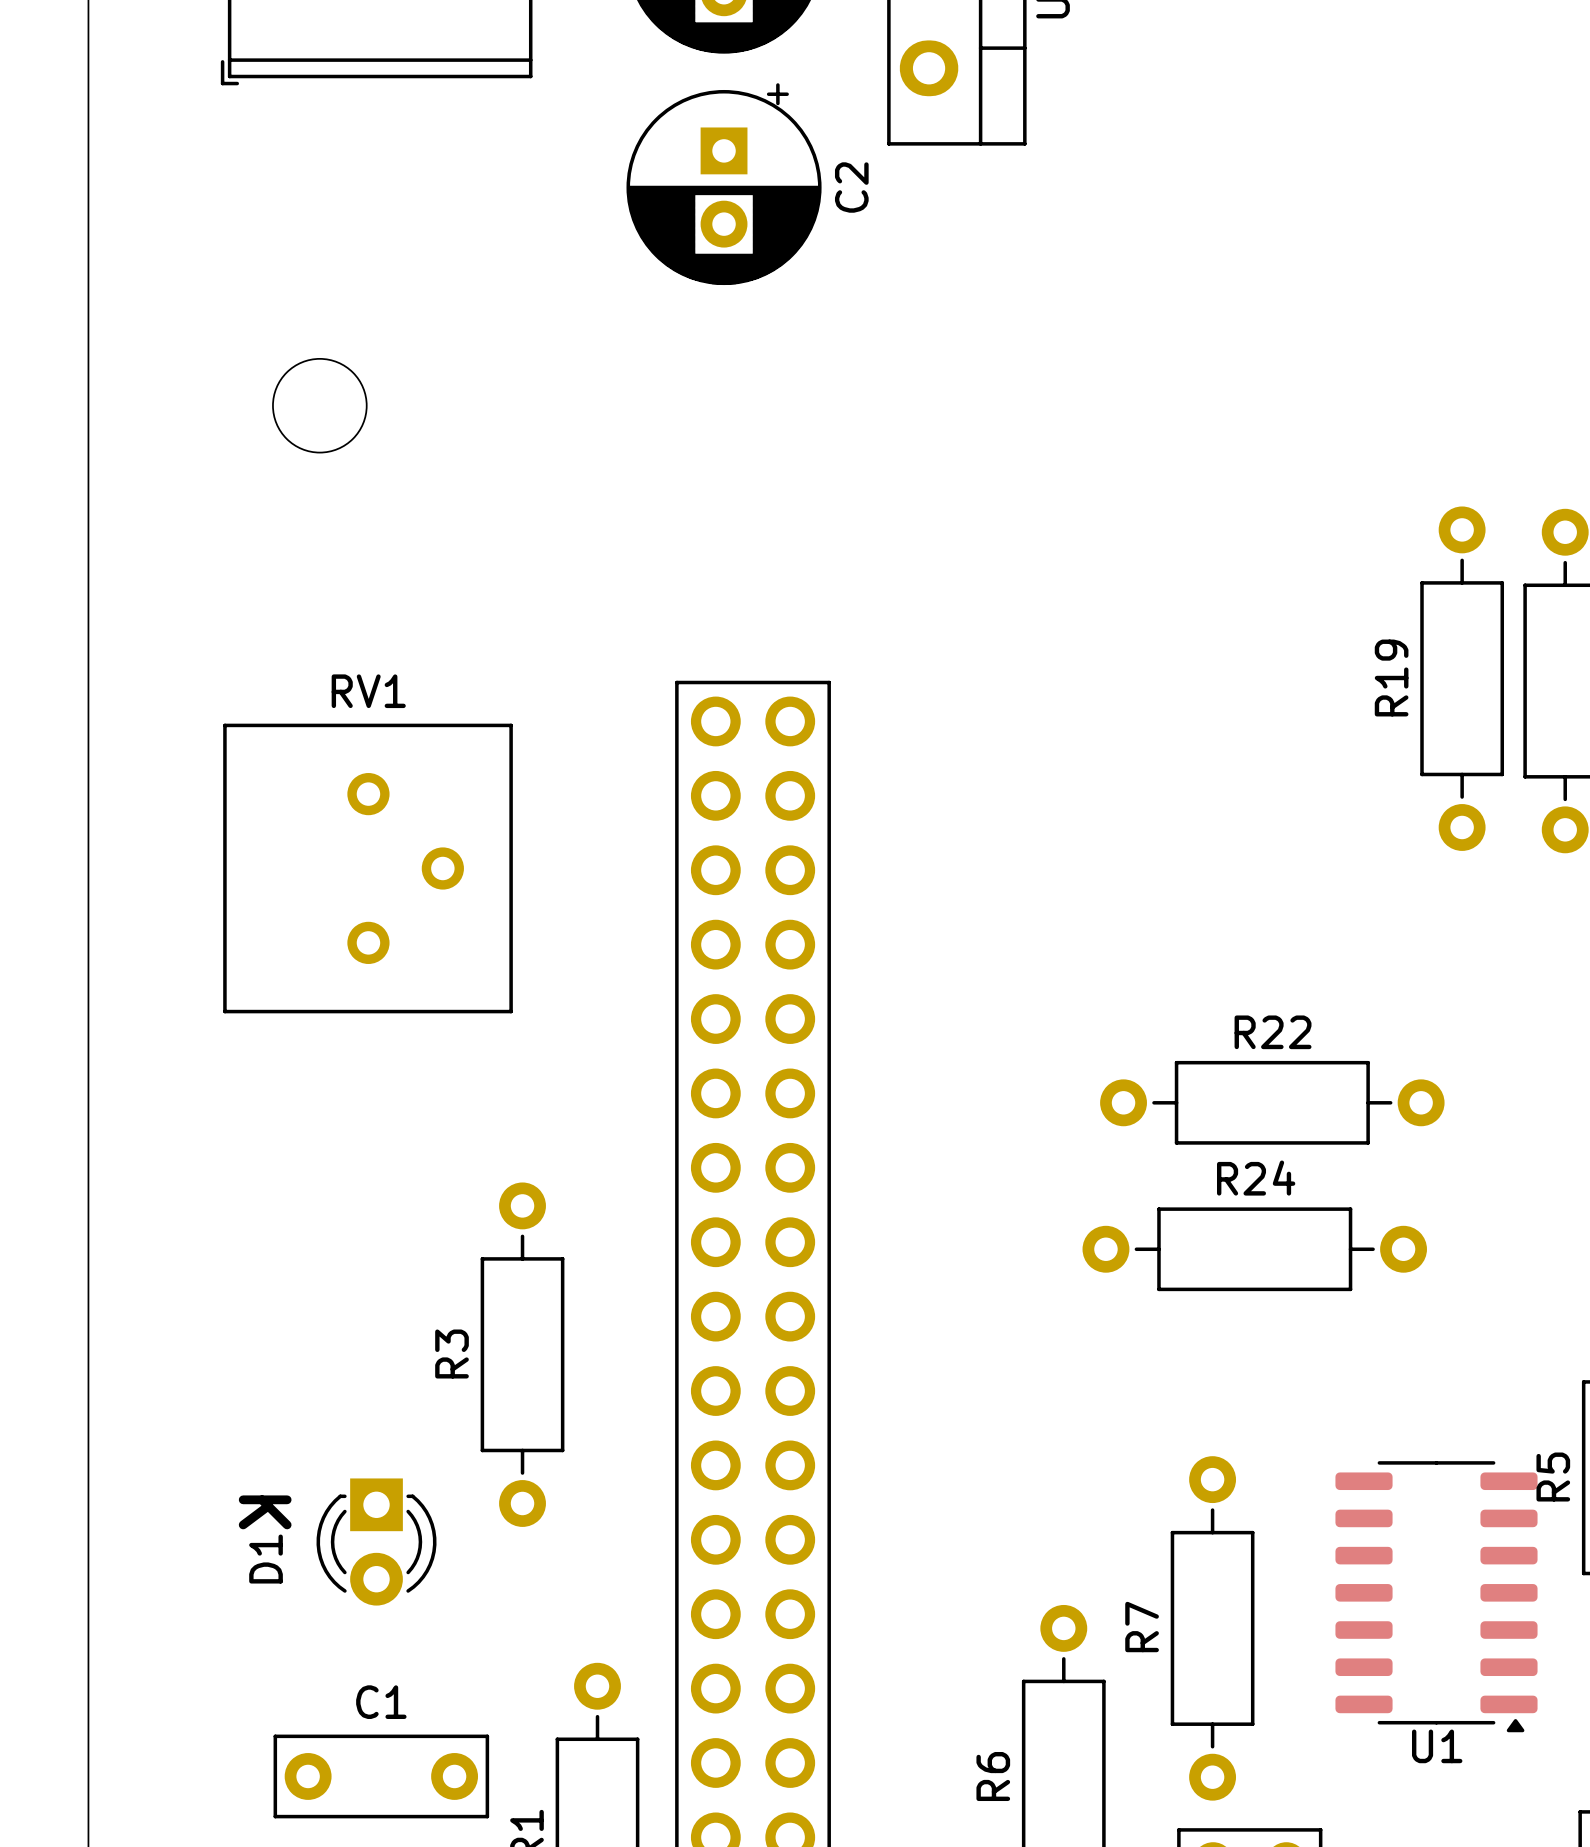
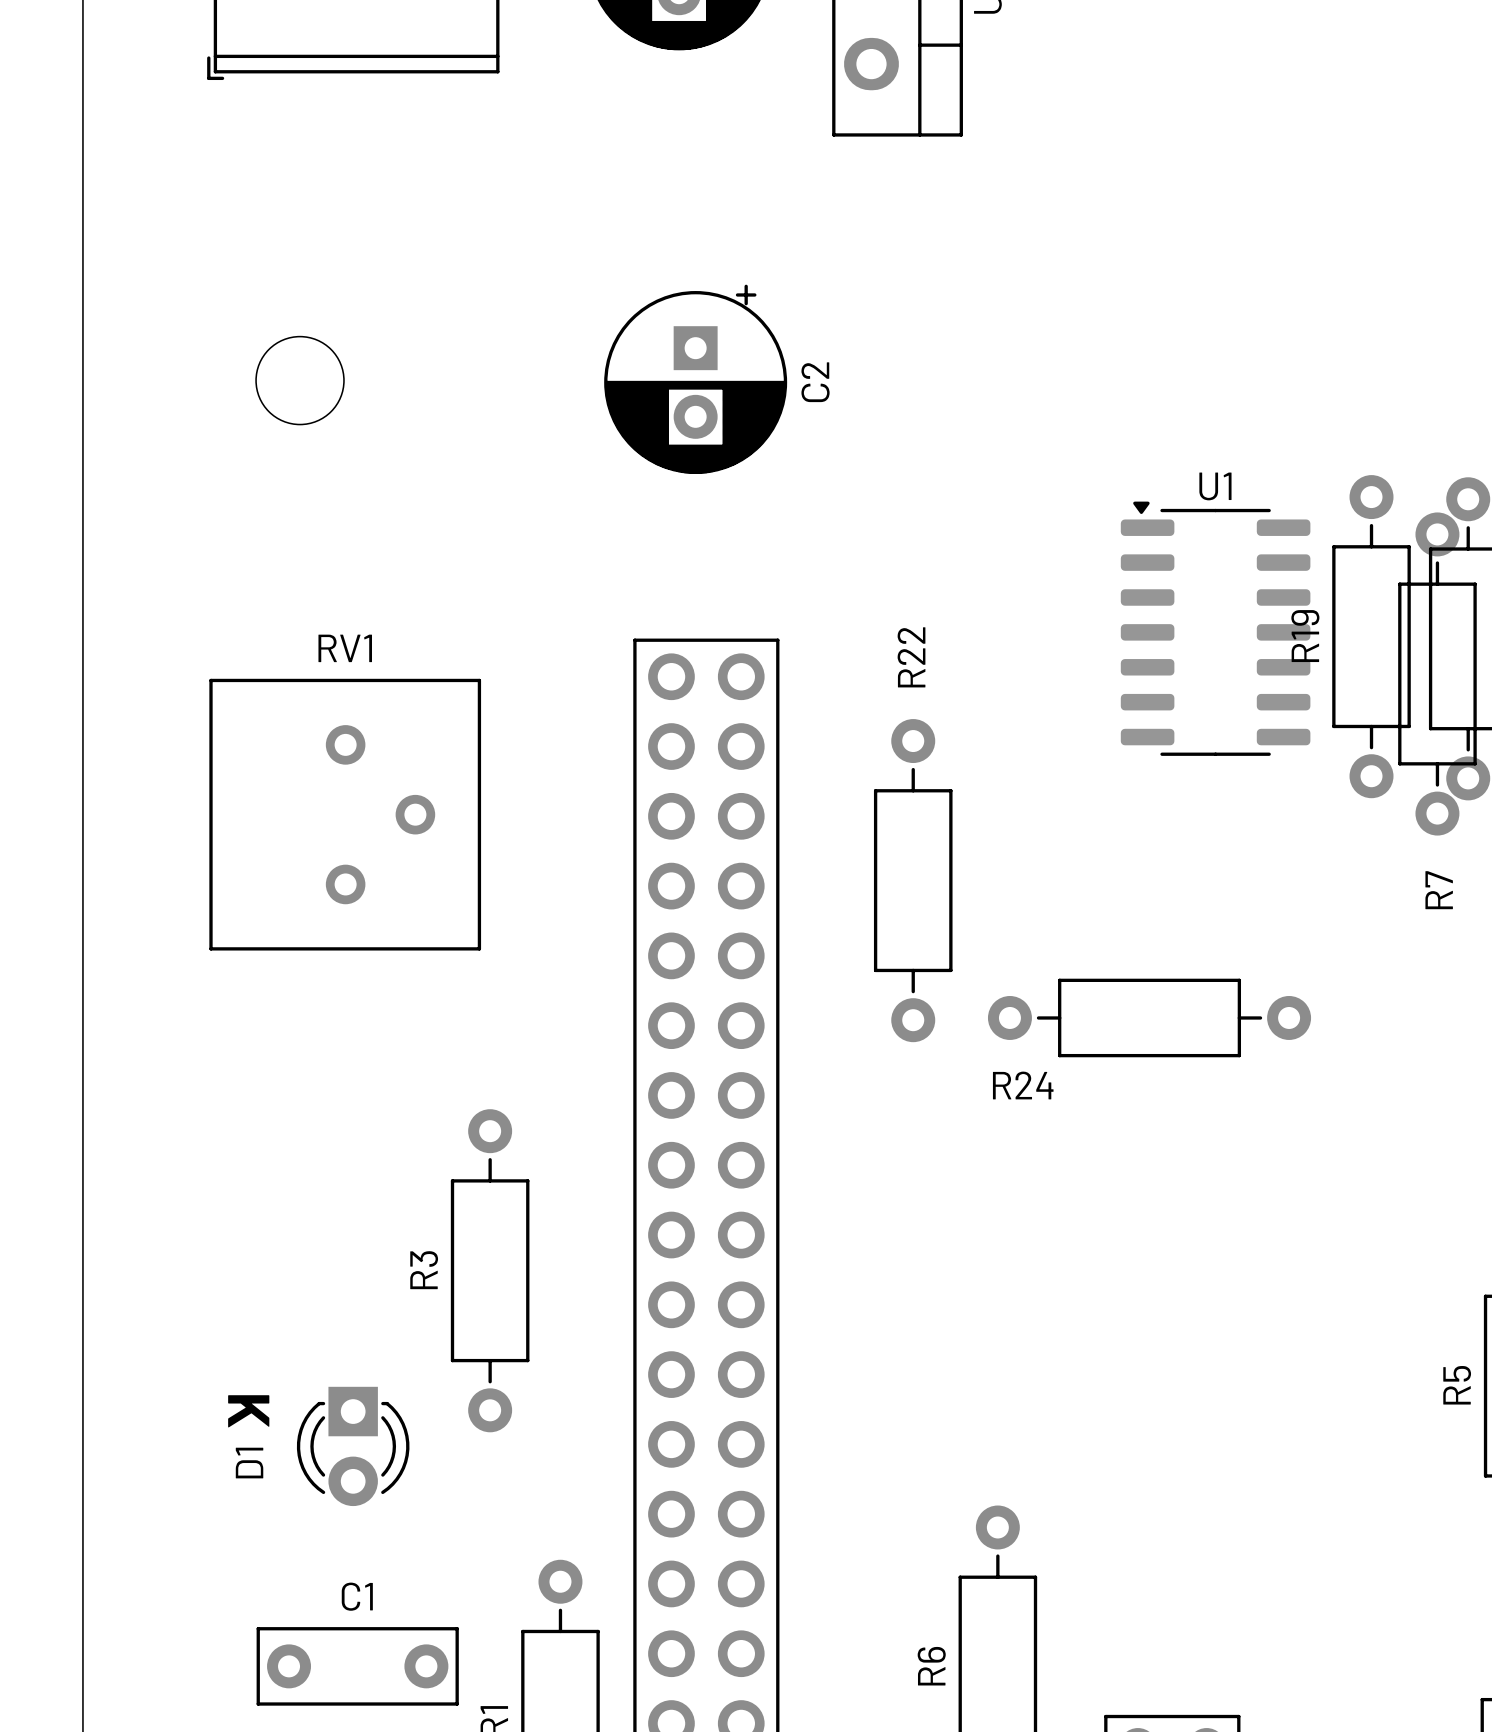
C2 position: (724, 184) -> (695, 379)
R22 name position: R22 (1273, 1032) -> R22 (911, 657)
R22 rotation: 0° (1272, 1102) -> 90° clockwise (913, 880)
R22 position: (1272, 1102) -> (913, 880)
R24 name position: R24 (1256, 1178) -> R24 (1023, 1085)
R24 position: (1254, 1249) -> (1149, 1017)
U1 rotation: 0° (1436, 1596) -> 180° (1215, 628)
U1 position: (1436, 1596) -> (1215, 628)
R7 name position: R7 (1142, 1627) -> R7 (1439, 890)
R7 position: (1212, 1628) -> (1437, 674)

